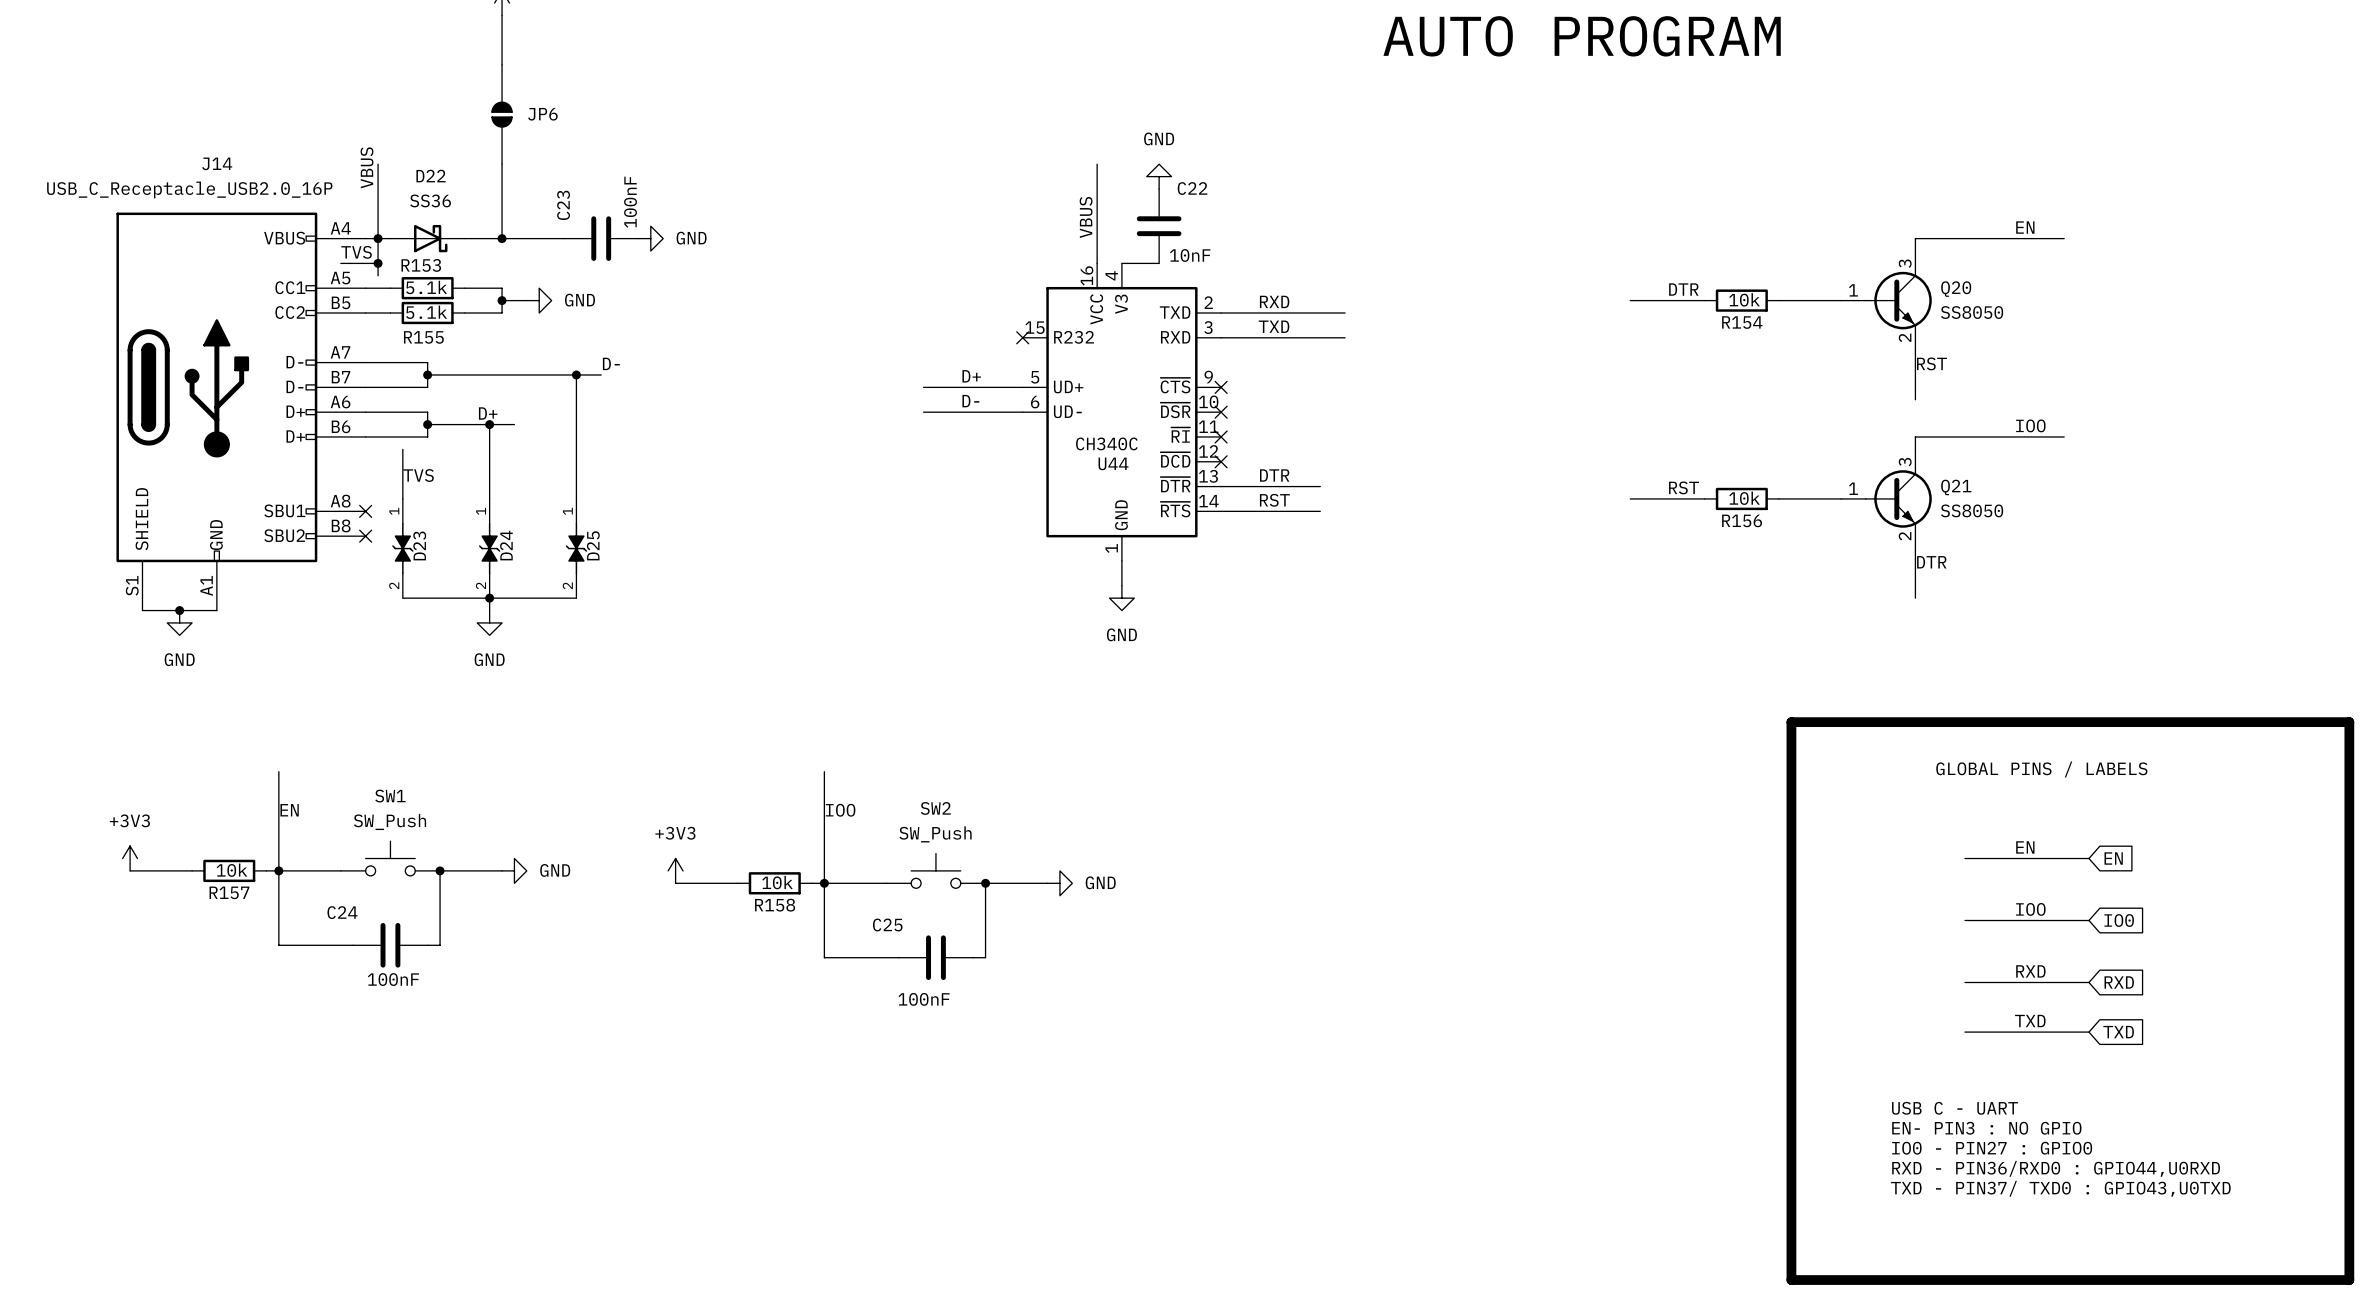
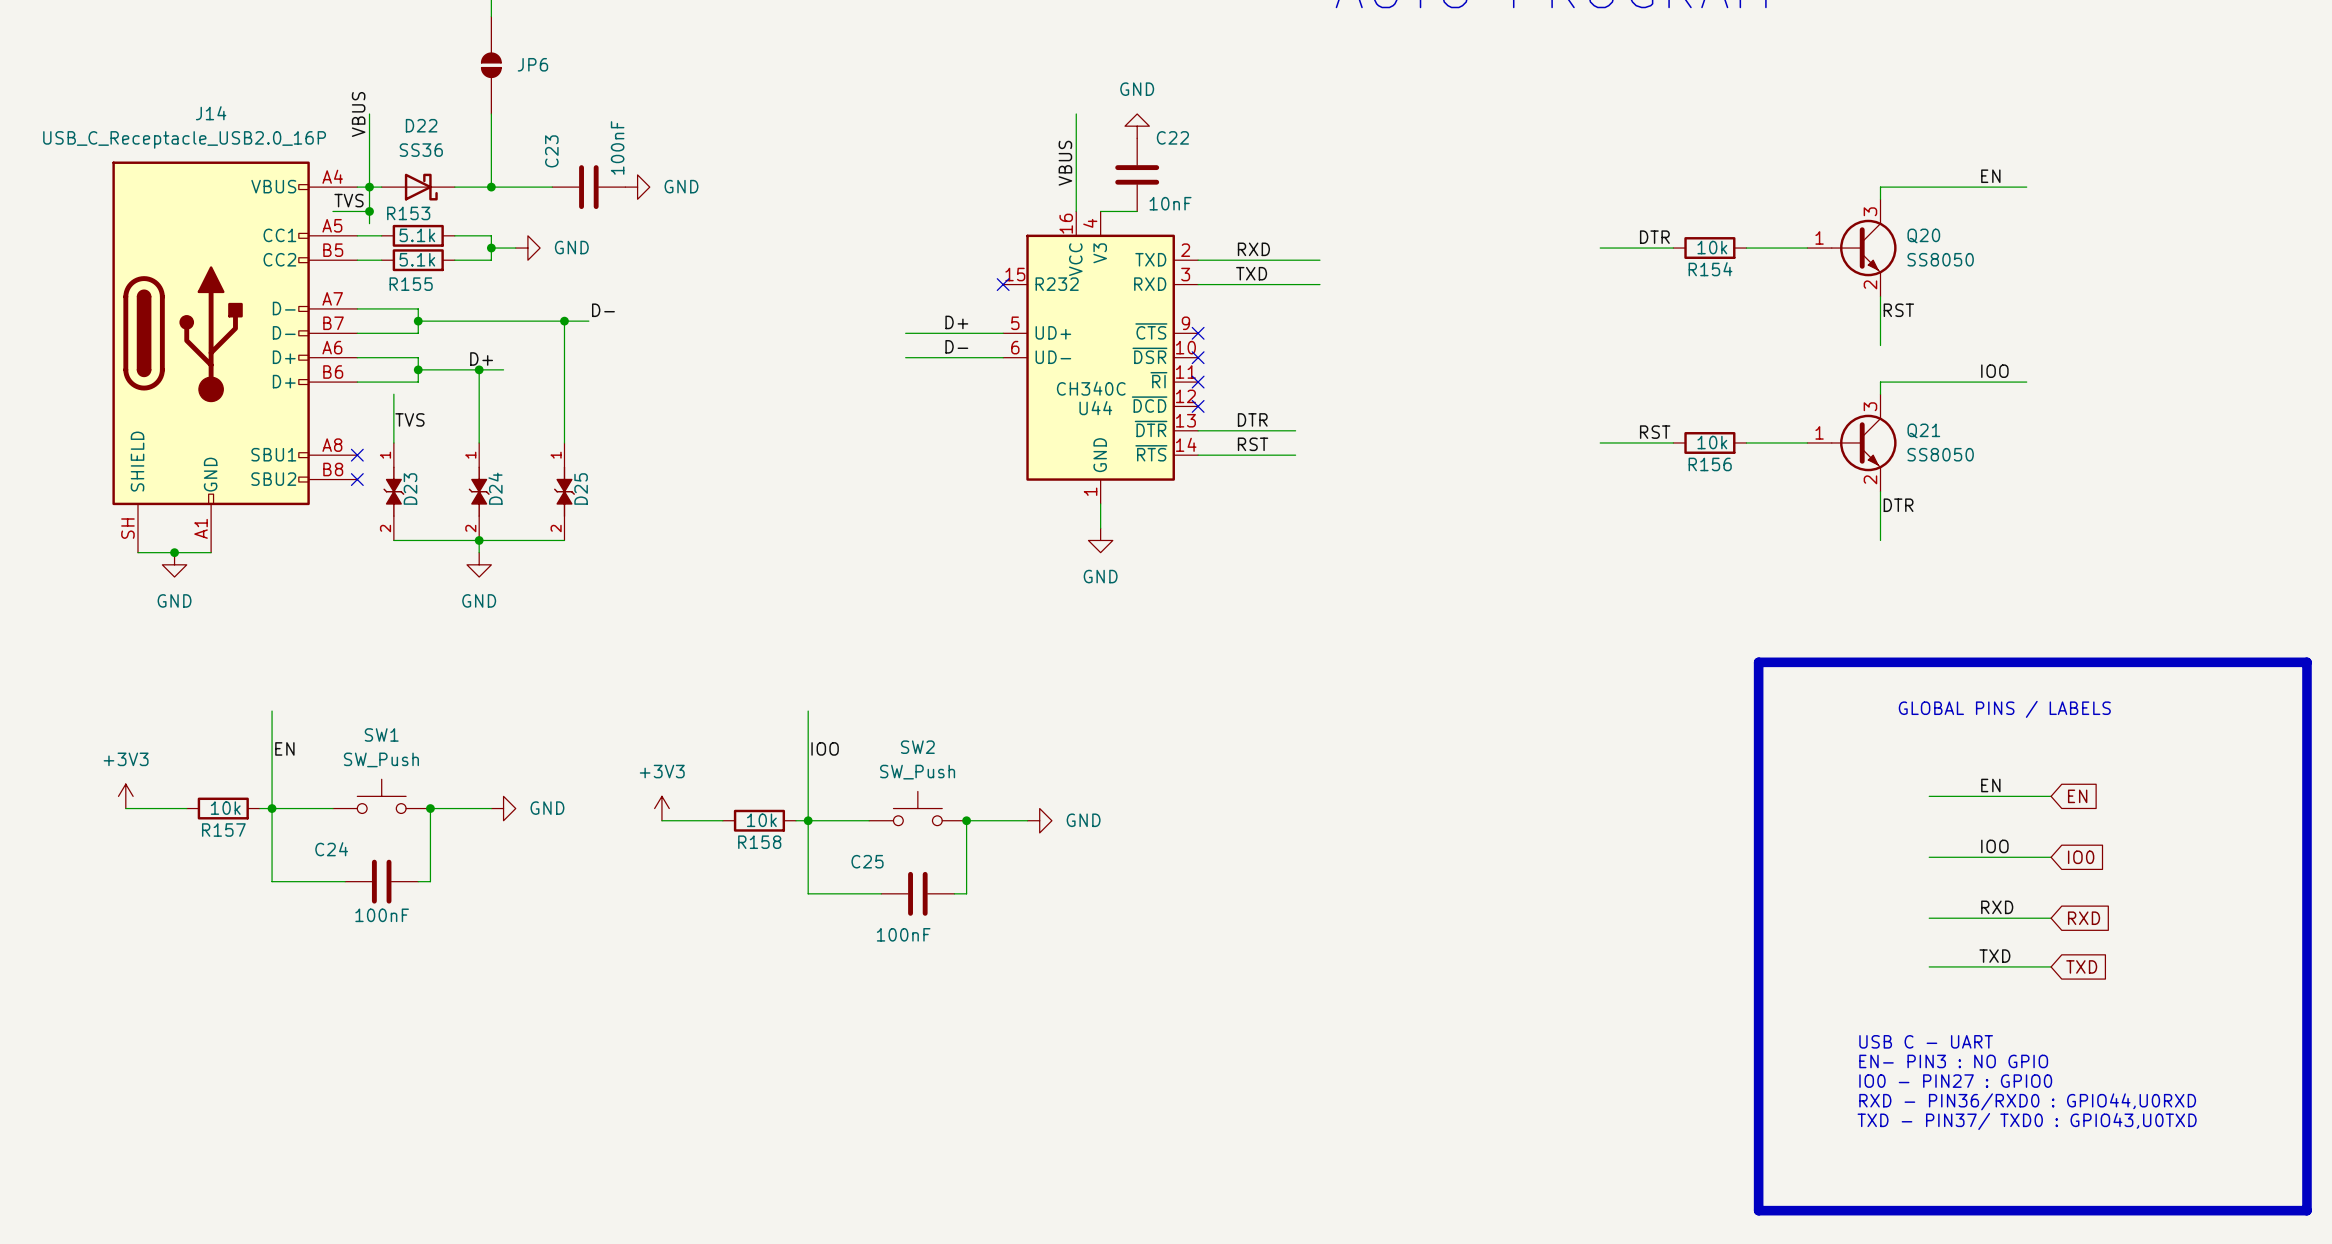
J14 pin number: S1 (132, 585) -> SH (127, 528)

